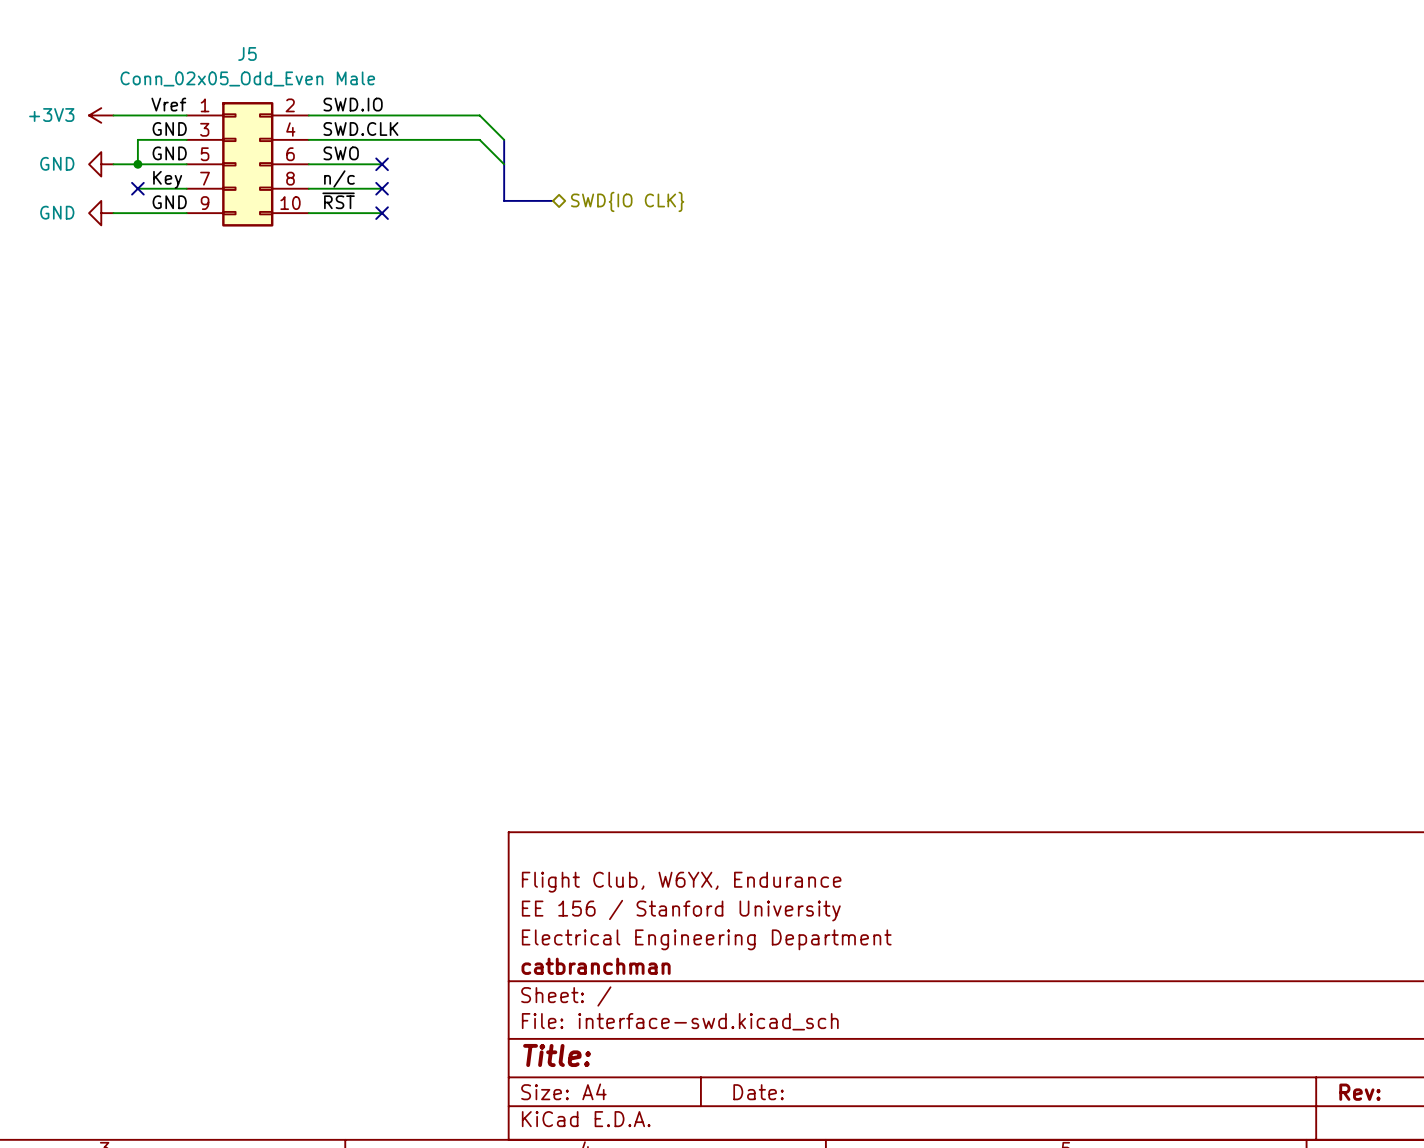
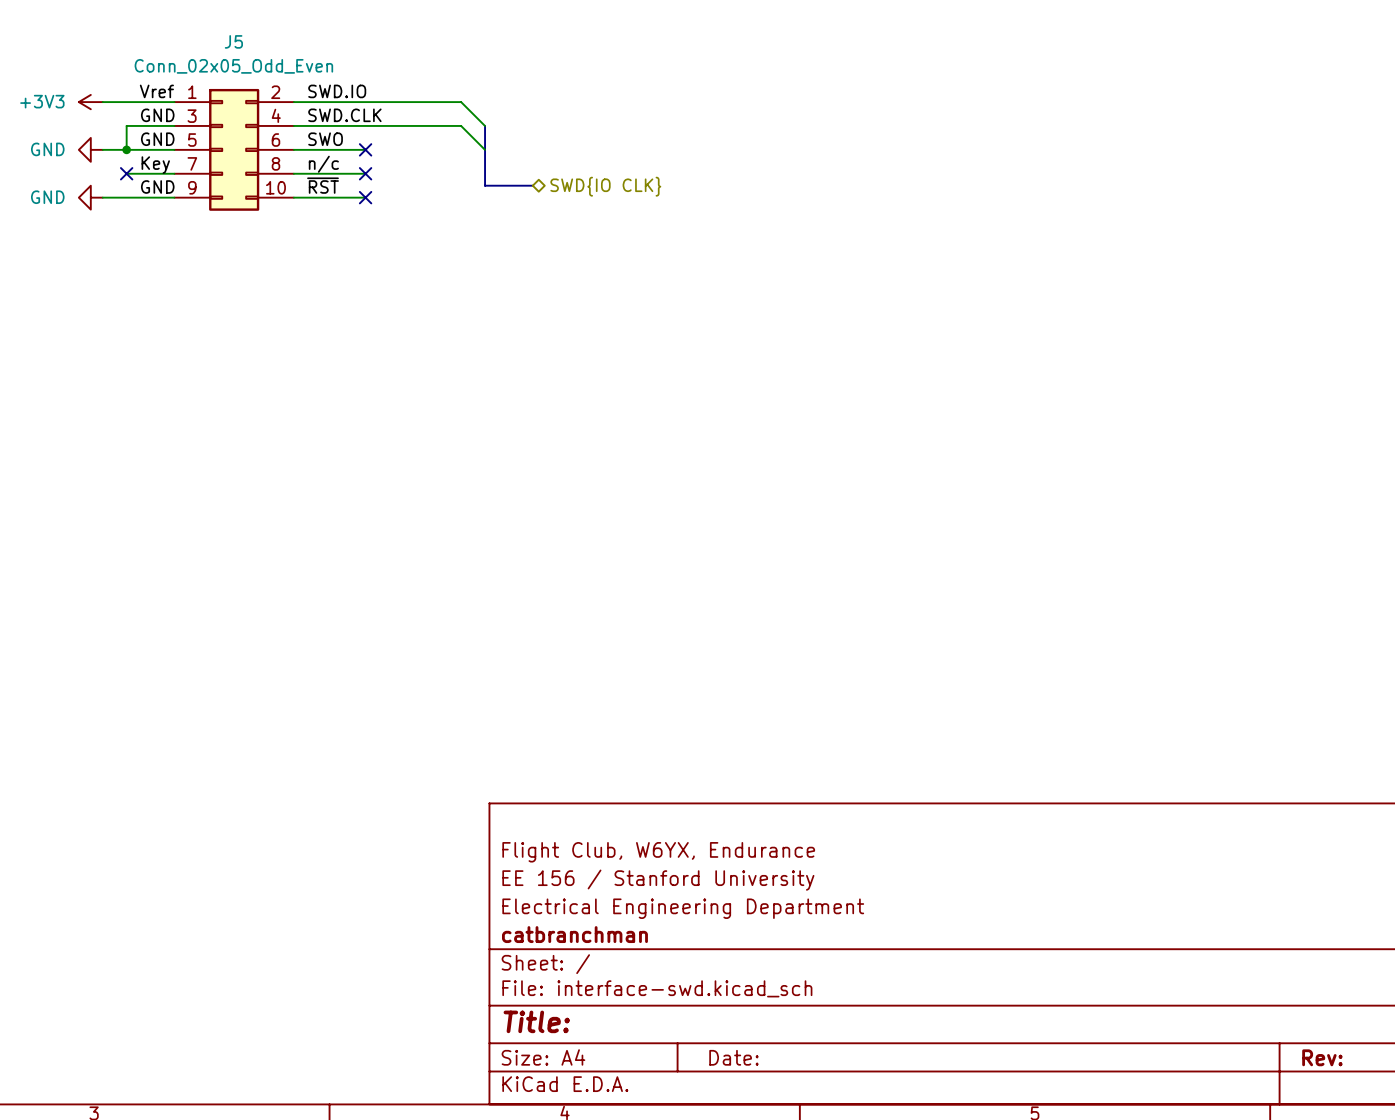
J5 value: Conn_02x05_Odd_Even Male (247, 78) -> Conn_02x05_Odd_Even (233, 66)

